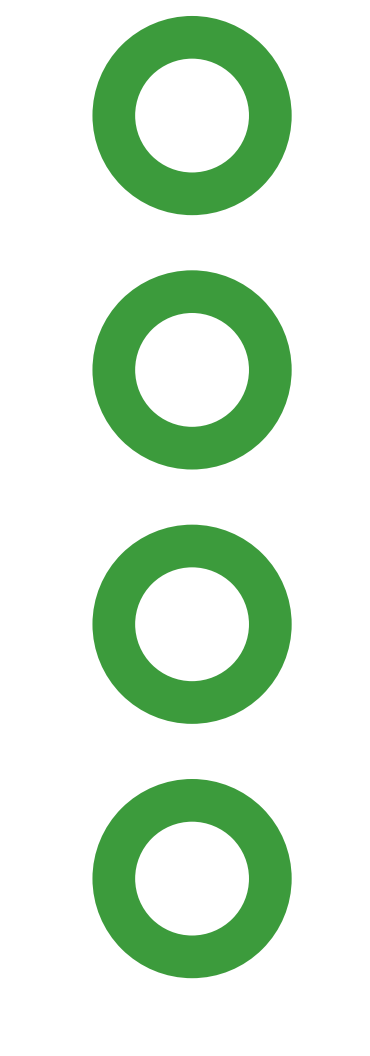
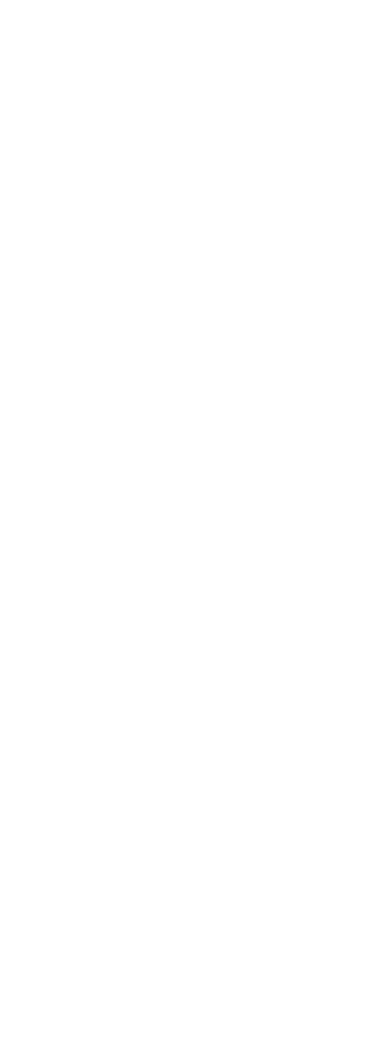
part: (192, 115) -> none
part: (192, 369) -> none
part: (192, 624) -> none
part: (192, 878) -> none

